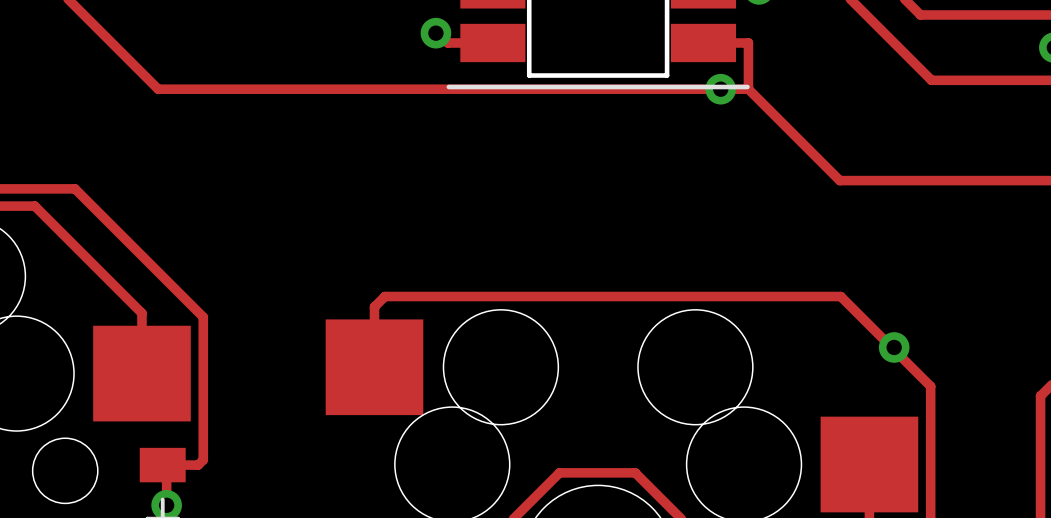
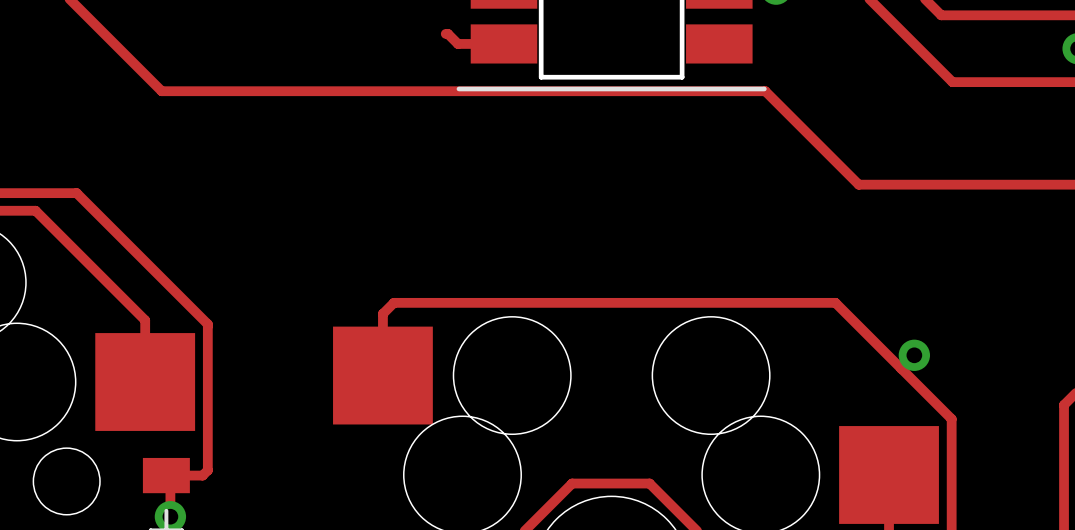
via: (435, 33) -> none
track: (703, 42) (748, 42) (748, 89) -> none
via: (720, 89) -> none
track: (384, 296) (840, 296) (930, 386) (930, 409) -> (393, 302) (835, 302) (951, 419)

